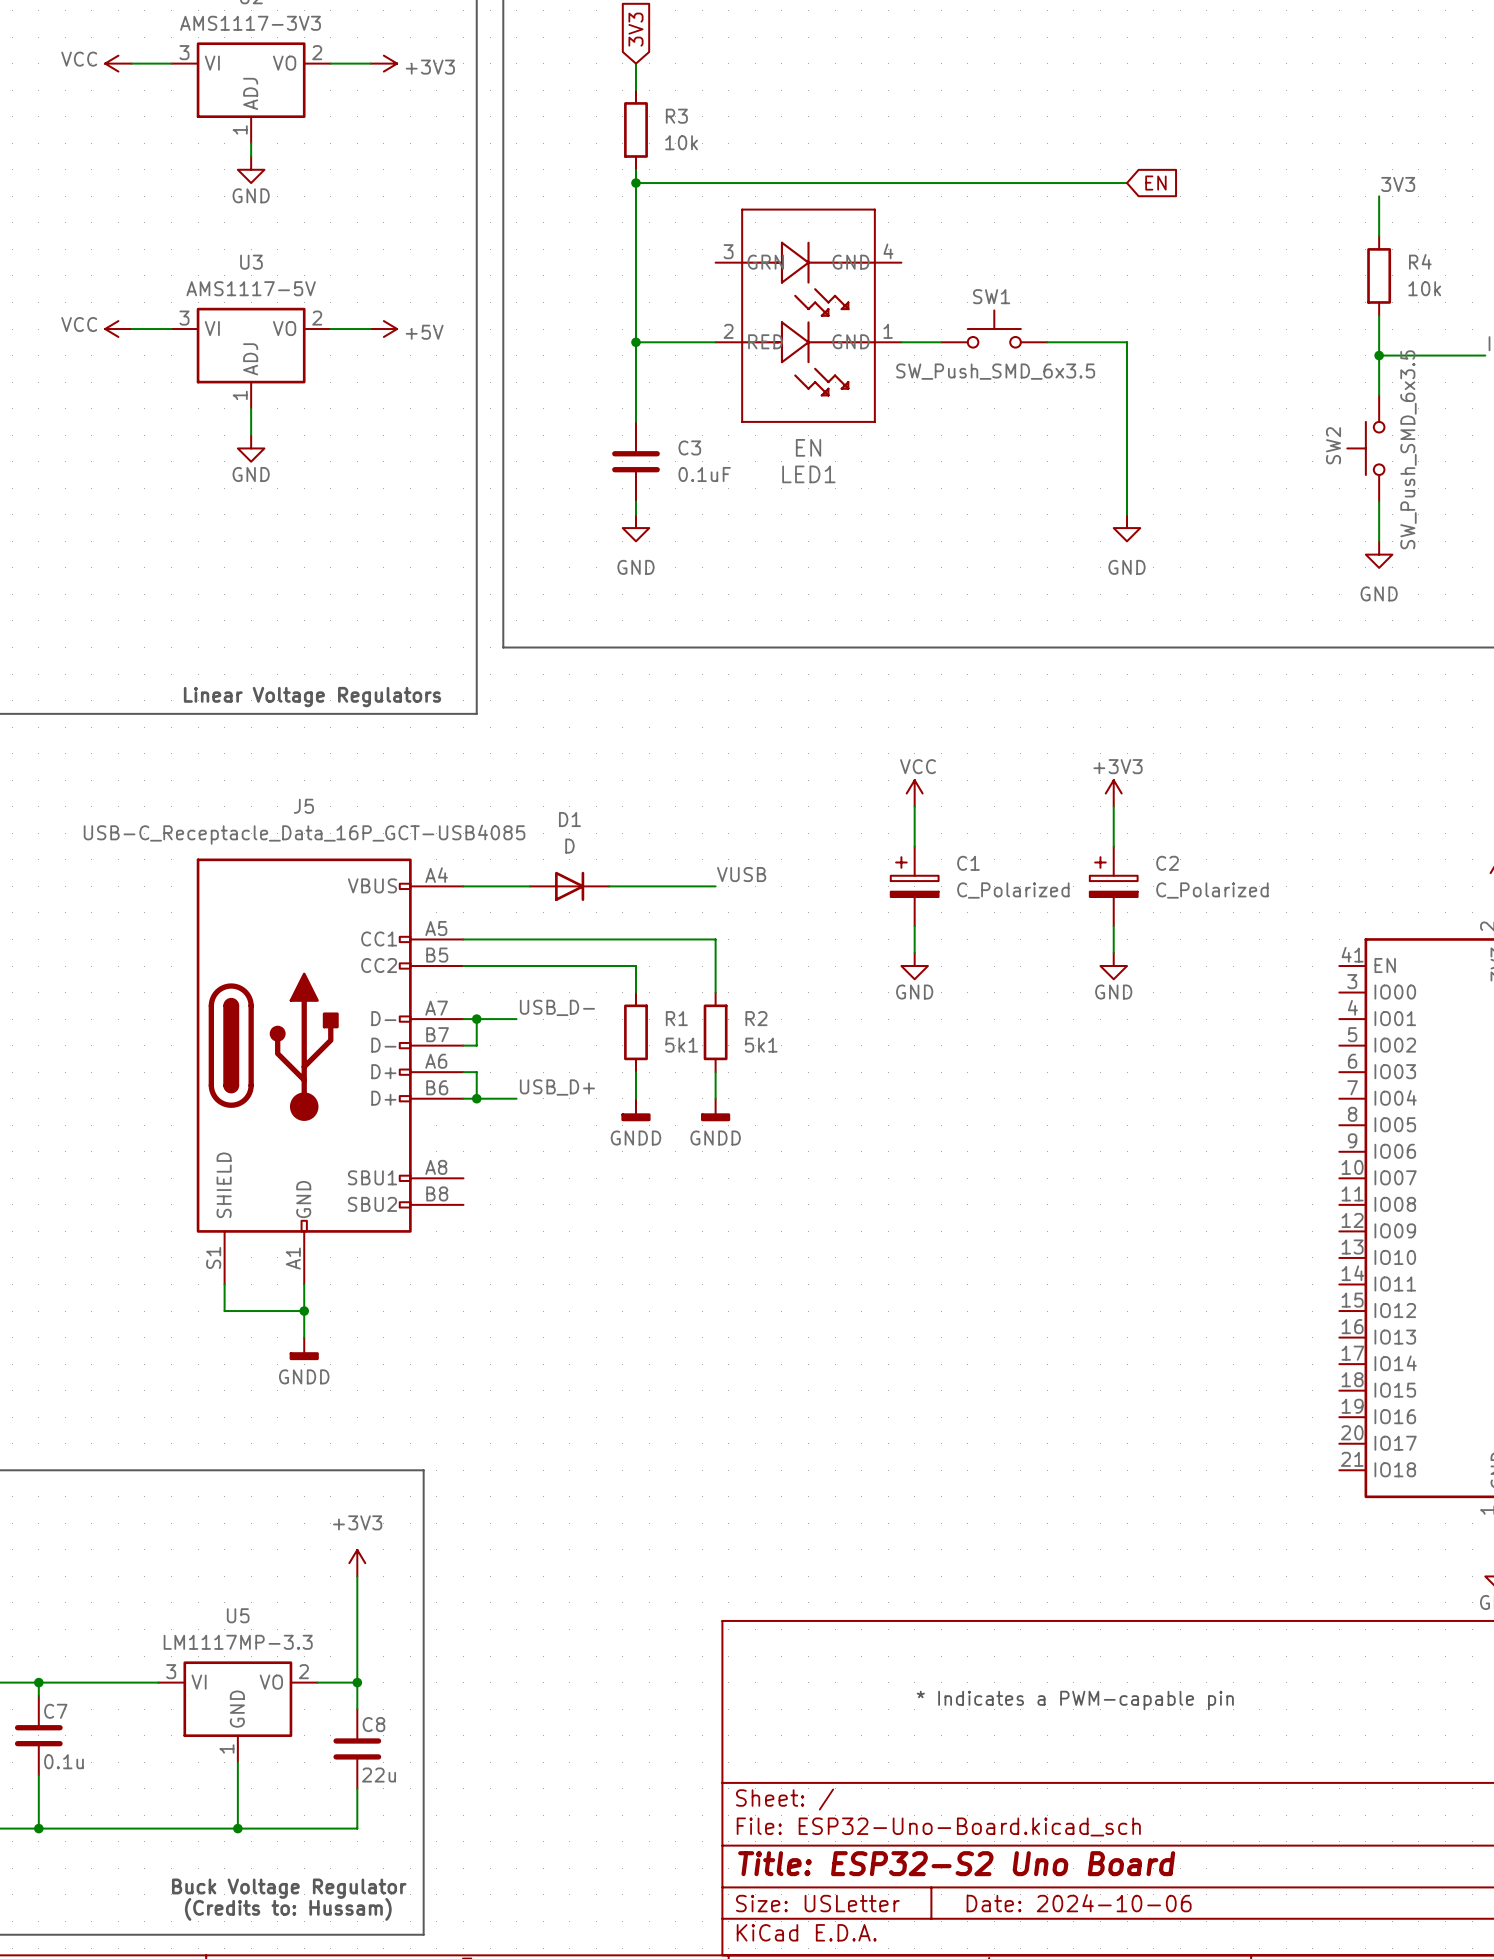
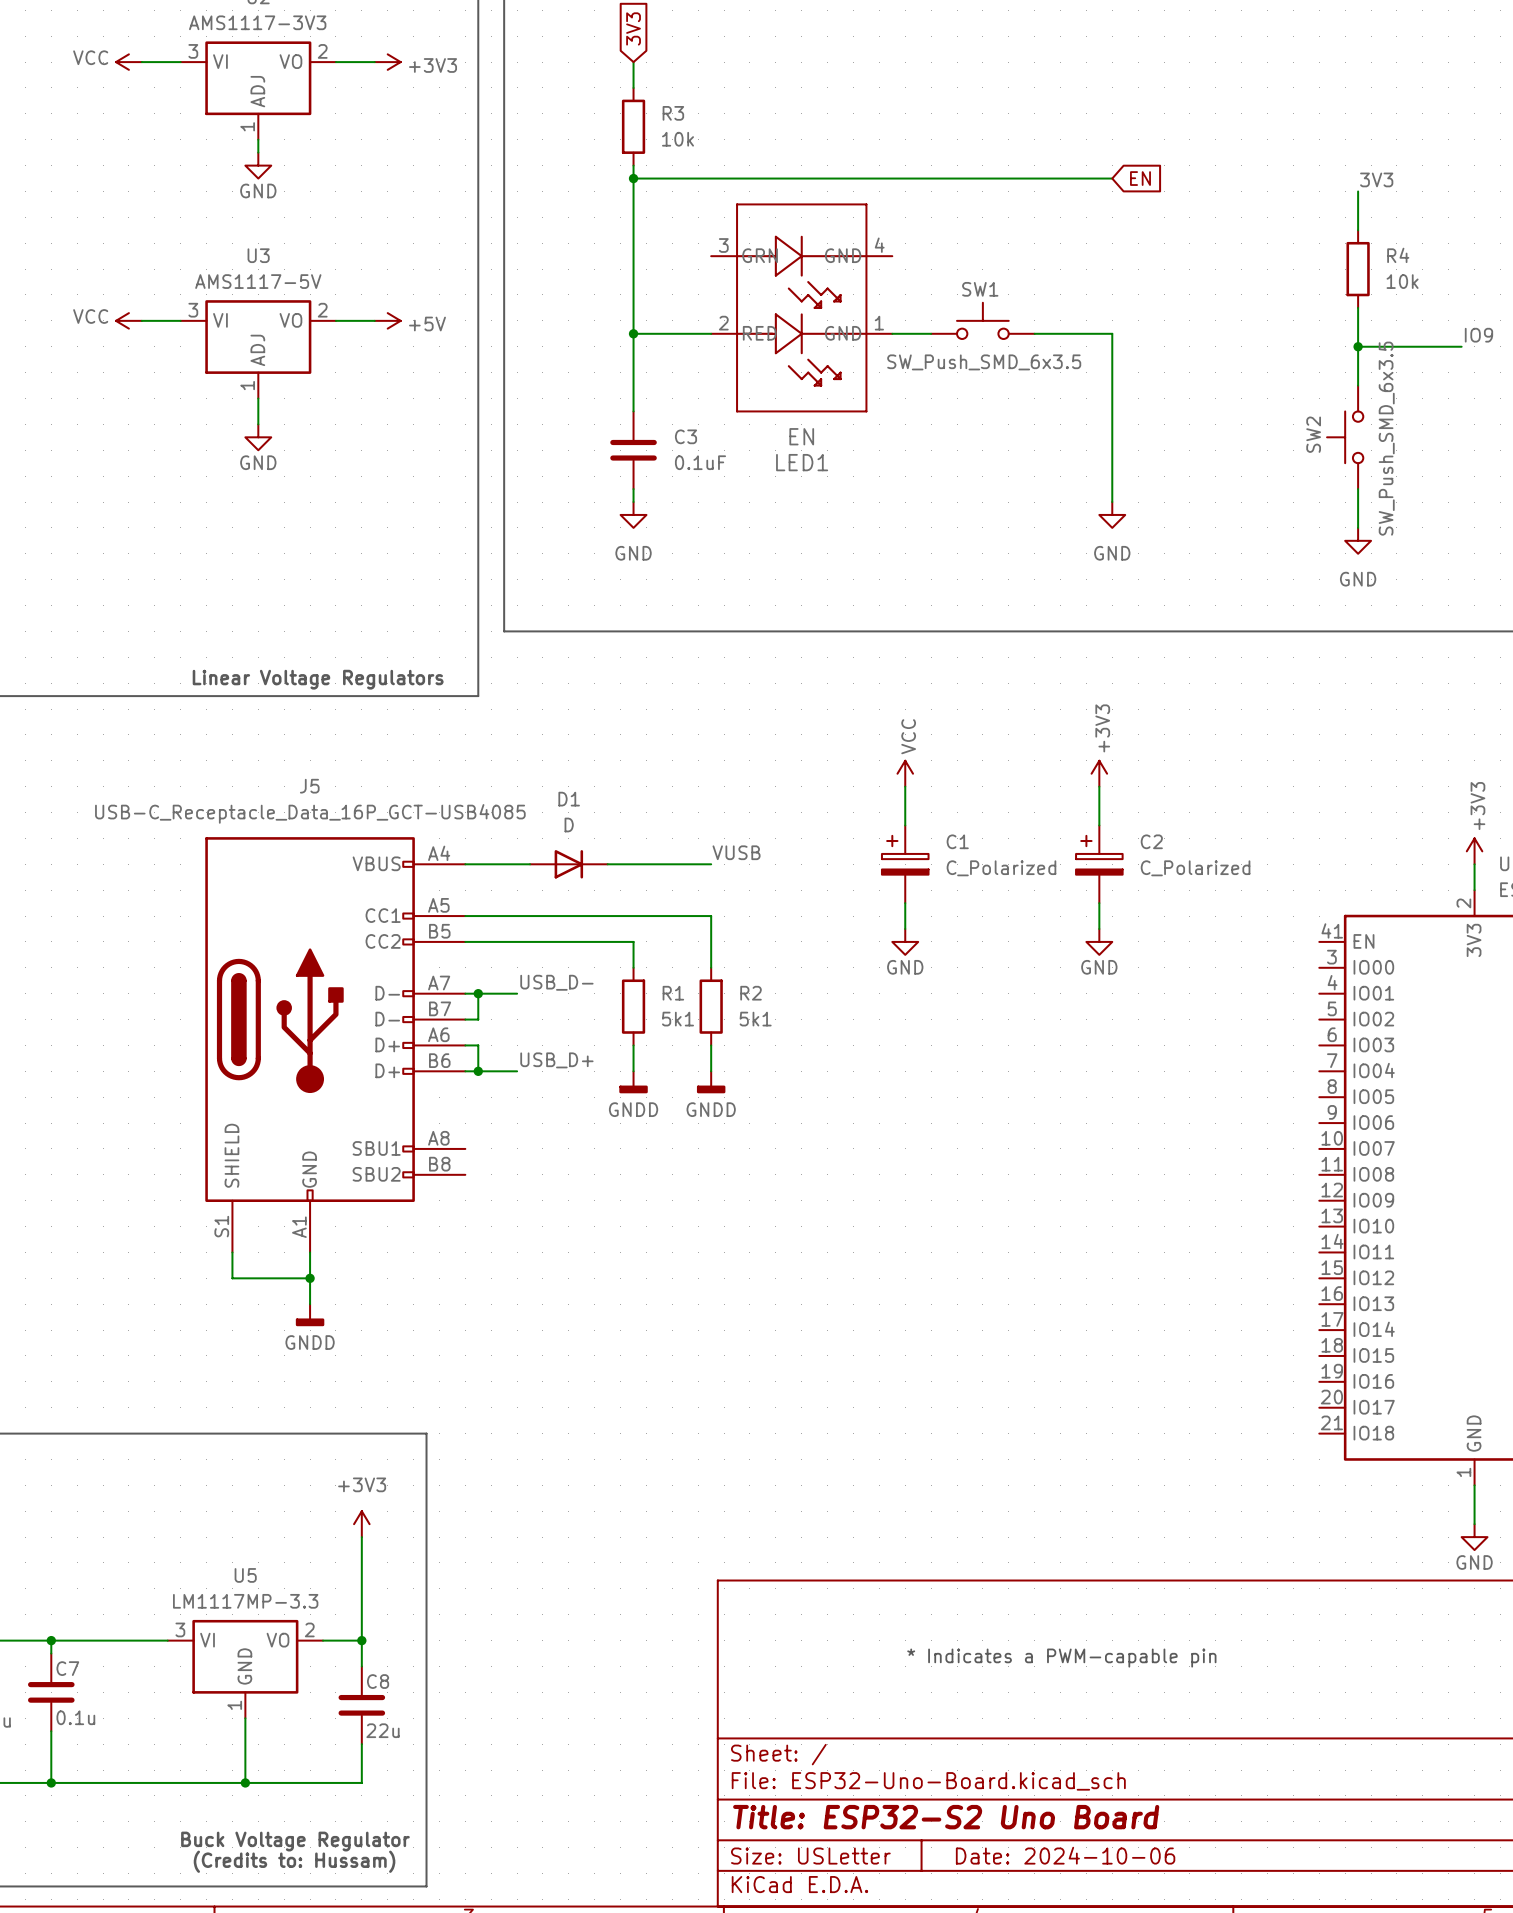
power symbol text rotation: 0° (918, 766) -> 90° counterclockwise (908, 736)
power symbol text rotation: 0° (1118, 766) -> 90° counterclockwise (1102, 728)

